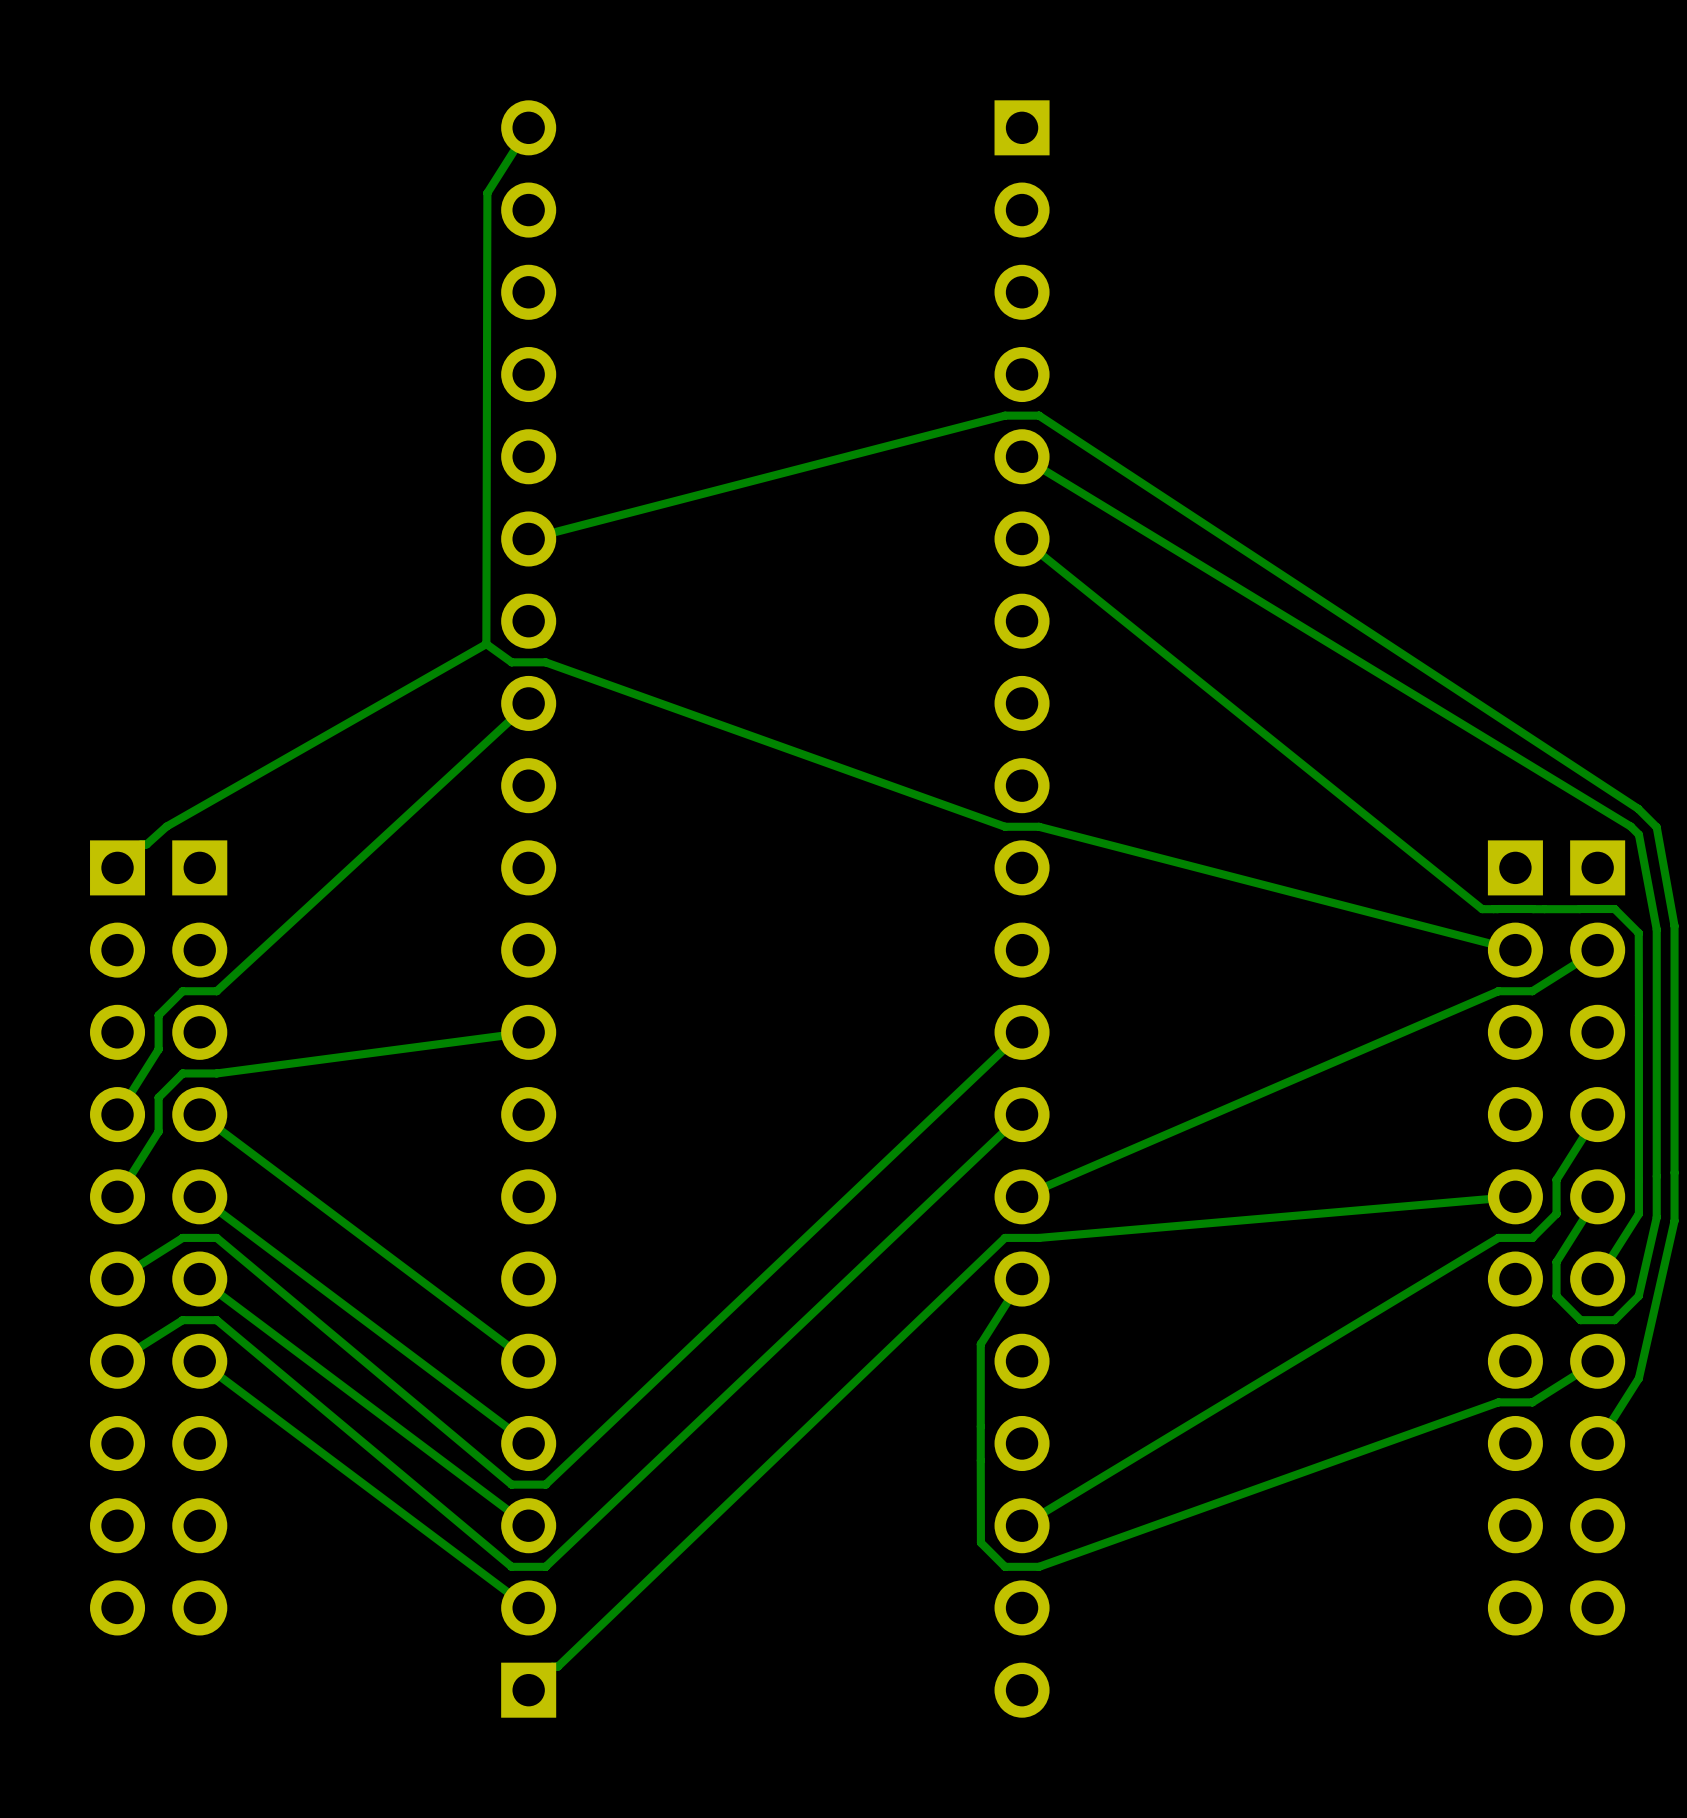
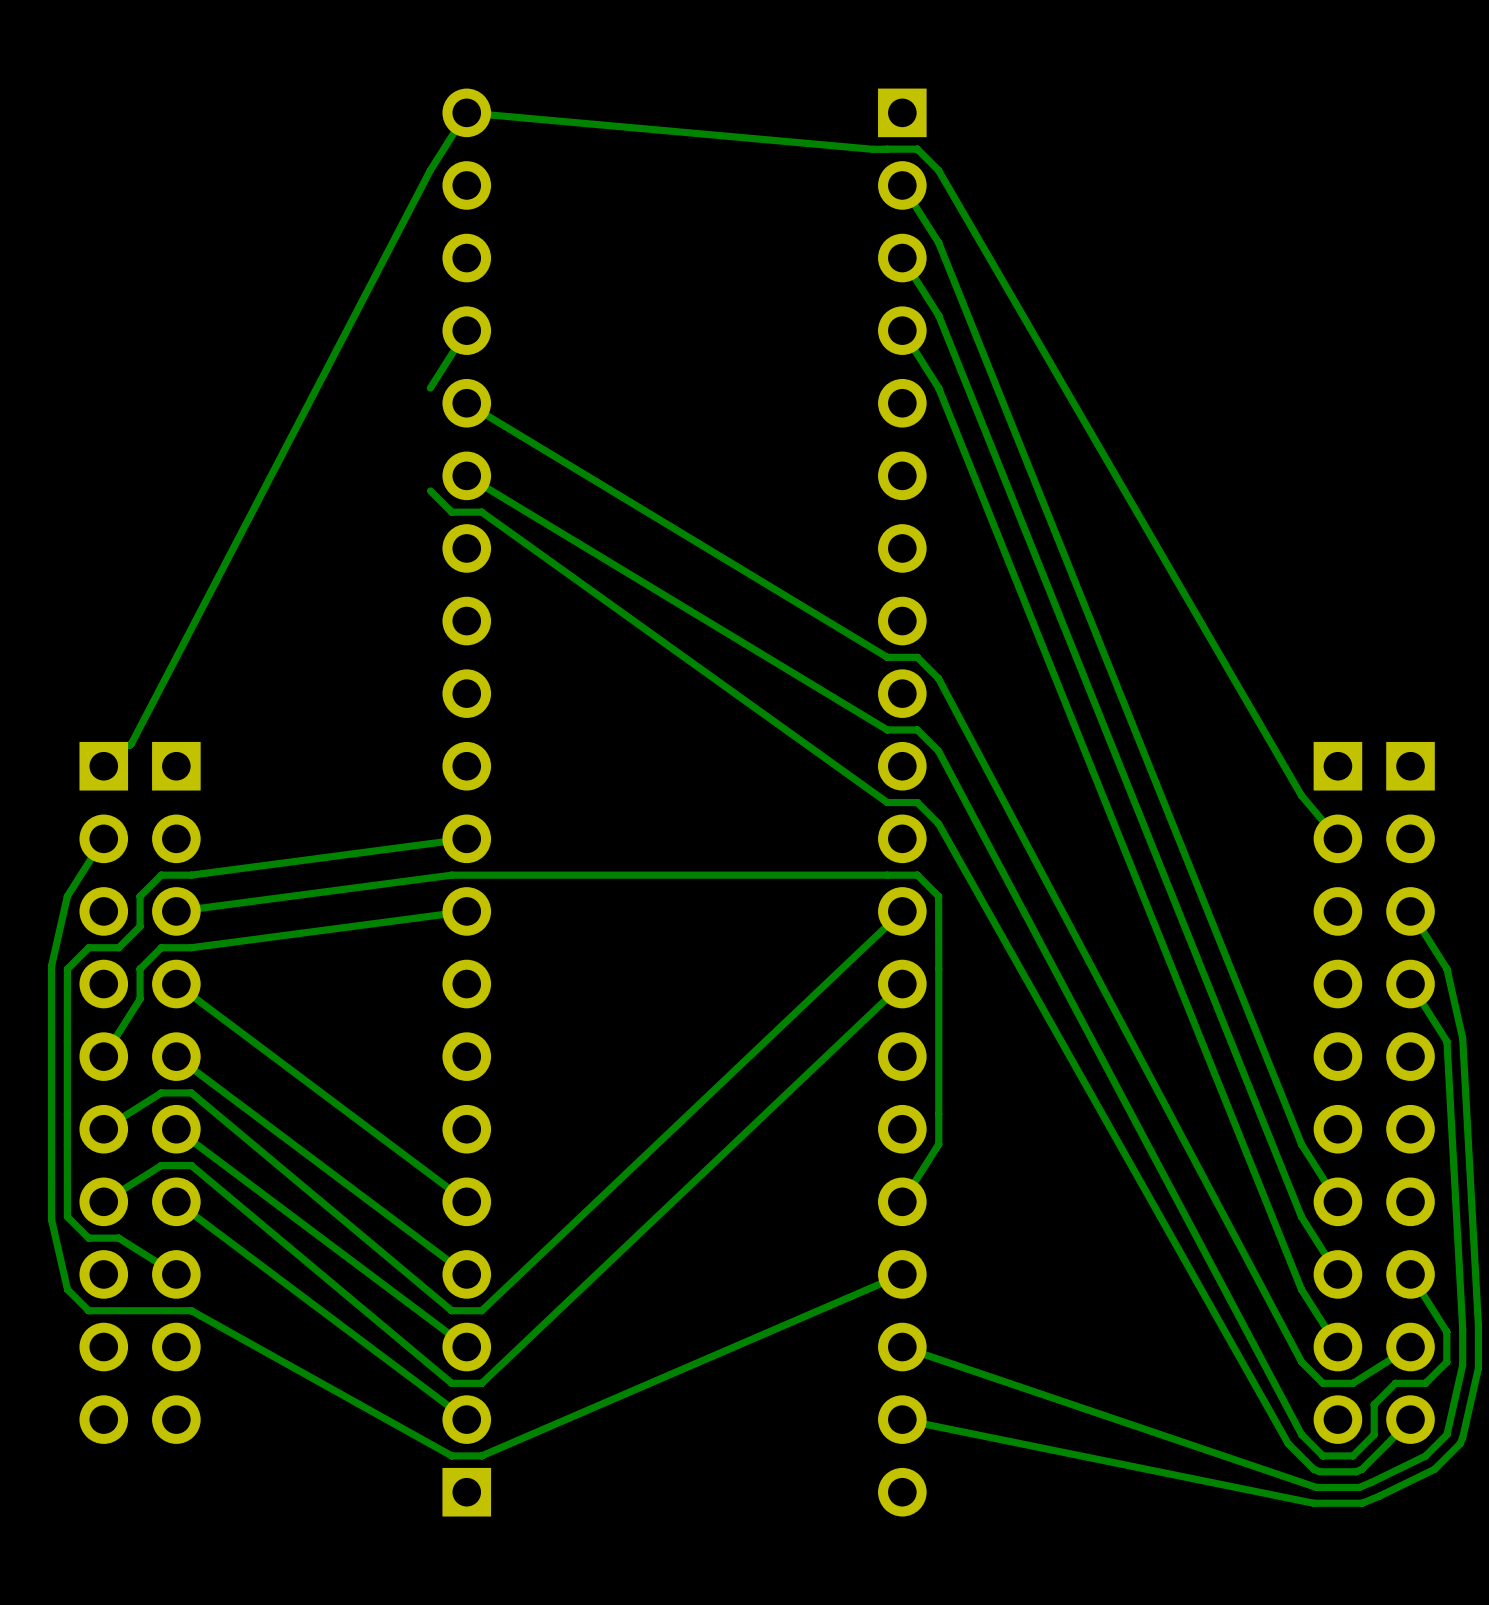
track: none -> (466, 112) (873, 149) (917, 149)
track: (487, 193) (486, 644) -> (430, 170) (129, 745)
track: none -> (902, 185) (938, 242)
track: none -> (938, 243) (1301, 1144)
track: none -> (902, 258) (938, 315)
track: none -> (938, 315) (1301, 1216)
track: none -> (466, 330) (430, 388)
track: none -> (902, 330) (938, 388)
track: (1039, 415) (1638, 808) (1656, 827) (1674, 926) (1674, 1220) (1638, 1378) -> none
track: (1039, 415) (1005, 415) (528, 538) -> none
track: none -> (938, 388) (1301, 1289)
track: none -> (466, 403) (887, 657)
track: (1022, 456) (1630, 826) (1638, 834) (1656, 929) (1656, 1217) (1638, 1296) -> none
track: (1022, 538) (1482, 909) (1614, 909) -> none
track: none -> (430, 490) (451, 512)
track: none -> (481, 512) (887, 802)
track: none -> (481, 512) (451, 512)
track: (486, 644) (511, 662) -> none
track: (486, 644) (166, 826) (146, 844) -> none
track: (511, 662) (545, 662) (1005, 826) -> (466, 475) (887, 729)
track: (528, 703) (216, 991) -> (466, 838) (191, 875)
track: none -> (917, 657) (938, 678) (1301, 1362) (1322, 1383)
track: none -> (917, 657) (887, 657)
track: (1039, 826) (1515, 950) -> (917, 149) (938, 170) (1301, 795) (1337, 838)
track: none -> (917, 729) (938, 751) (1301, 1434) (1322, 1455)
track: none -> (917, 802) (938, 823) (1288, 1443) (1313, 1469) (1319, 1471) (1356, 1471) (1361, 1469) (1410, 1419)
track: none -> (917, 802) (887, 802)
track: (1614, 909) (1638, 933) -> (917, 875) (938, 896)
track: (1638, 933) (1638, 1213) -> (938, 896) (938, 1144)
track: none -> (103, 838) (67, 896)
track: (1597, 950) (1532, 991) -> (1410, 1347) (1353, 1383)
track: none -> (917, 875) (451, 875) (176, 911)
track: (1498, 991) (1022, 1196) -> (902, 1274) (481, 1455)
track: (1532, 991) (1498, 991) -> (1352, 1383) (1322, 1383)
track: none -> (67, 896) (51, 965) (51, 1219) (67, 1289)
track: none -> (1410, 911) (1446, 968)
track: (158, 1049) (117, 1114) -> (140, 926) (118, 947)
track: none -> (88, 947) (67, 968)
track: none -> (118, 947) (88, 947)
track: none -> (67, 969) (67, 1216)
track: none -> (1446, 969) (1462, 1038) (1478, 1325) (1478, 1368) (1460, 1443) (1434, 1469) (1362, 1503) (1313, 1503) (902, 1419)
track: (1597, 1114) (1556, 1179) -> (1410, 984) (1446, 1041)
track: (1556, 1179) (1556, 1213) -> (1446, 1332) (1446, 1361)
track: none -> (1446, 1041) (1462, 1328) (1462, 1365) (1446, 1434)
track: (1515, 1196) (1039, 1237) (1005, 1237) -> none
track: (1597, 1196) (1556, 1261) -> none
track: (1556, 1213) (1532, 1237) -> (1446, 1362) (1425, 1383)
track: (1638, 1213) (1597, 1279) -> (938, 1144) (902, 1201)
track: (1004, 1237) (557, 1666) (552, 1666) (528, 1690) -> none
track: (1498, 1237) (1022, 1525) -> (1446, 1434) (1425, 1455) (1359, 1487) (1316, 1487) (902, 1347)
track: (1532, 1237) (1498, 1237) -> (1425, 1383) (1395, 1383)
track: (1556, 1262) (1556, 1296) -> (1374, 1404) (1374, 1434)
track: (1022, 1279) (980, 1344) -> none
track: none -> (1301, 1144) (1337, 1201)
track: (1556, 1296) (1580, 1320) -> none
track: (1638, 1296) (1614, 1320) -> (1374, 1434) (1353, 1455)
track: (1614, 1320) (1580, 1320) -> (1352, 1455) (1322, 1455)
track: (980, 1344) (980, 1542) -> none
track: (1597, 1361) (1532, 1402) -> none
track: none -> (67, 1216) (88, 1238)
track: none -> (1301, 1216) (1337, 1274)
track: (1638, 1378) (1597, 1443) -> (1446, 1331) (1410, 1274)
track: none -> (118, 1238) (176, 1274)
track: none -> (118, 1238) (88, 1238)
track: (1532, 1402) (1498, 1402) (1039, 1566) (1005, 1566) -> none
track: none -> (67, 1289) (88, 1310)
track: none -> (1301, 1289) (1337, 1347)
track: none -> (191, 1310) (451, 1455)
track: none -> (191, 1310) (88, 1310)
track: (980, 1542) (1004, 1566) -> none
track: none -> (1395, 1383) (1374, 1404)
track: none -> (481, 1455) (451, 1455)

